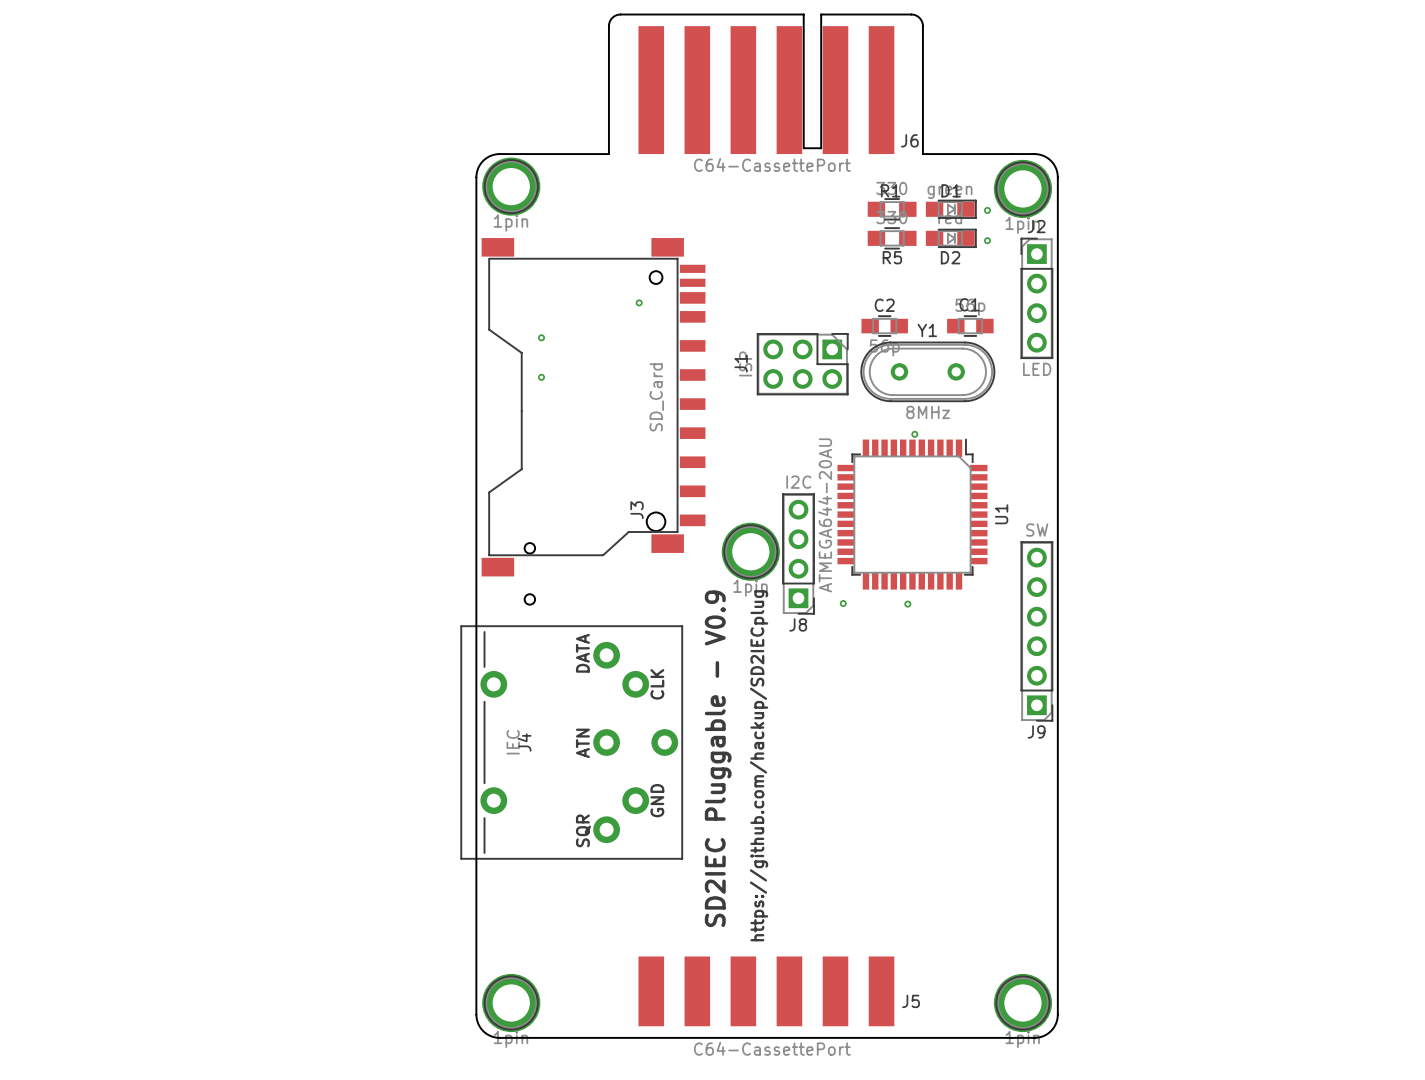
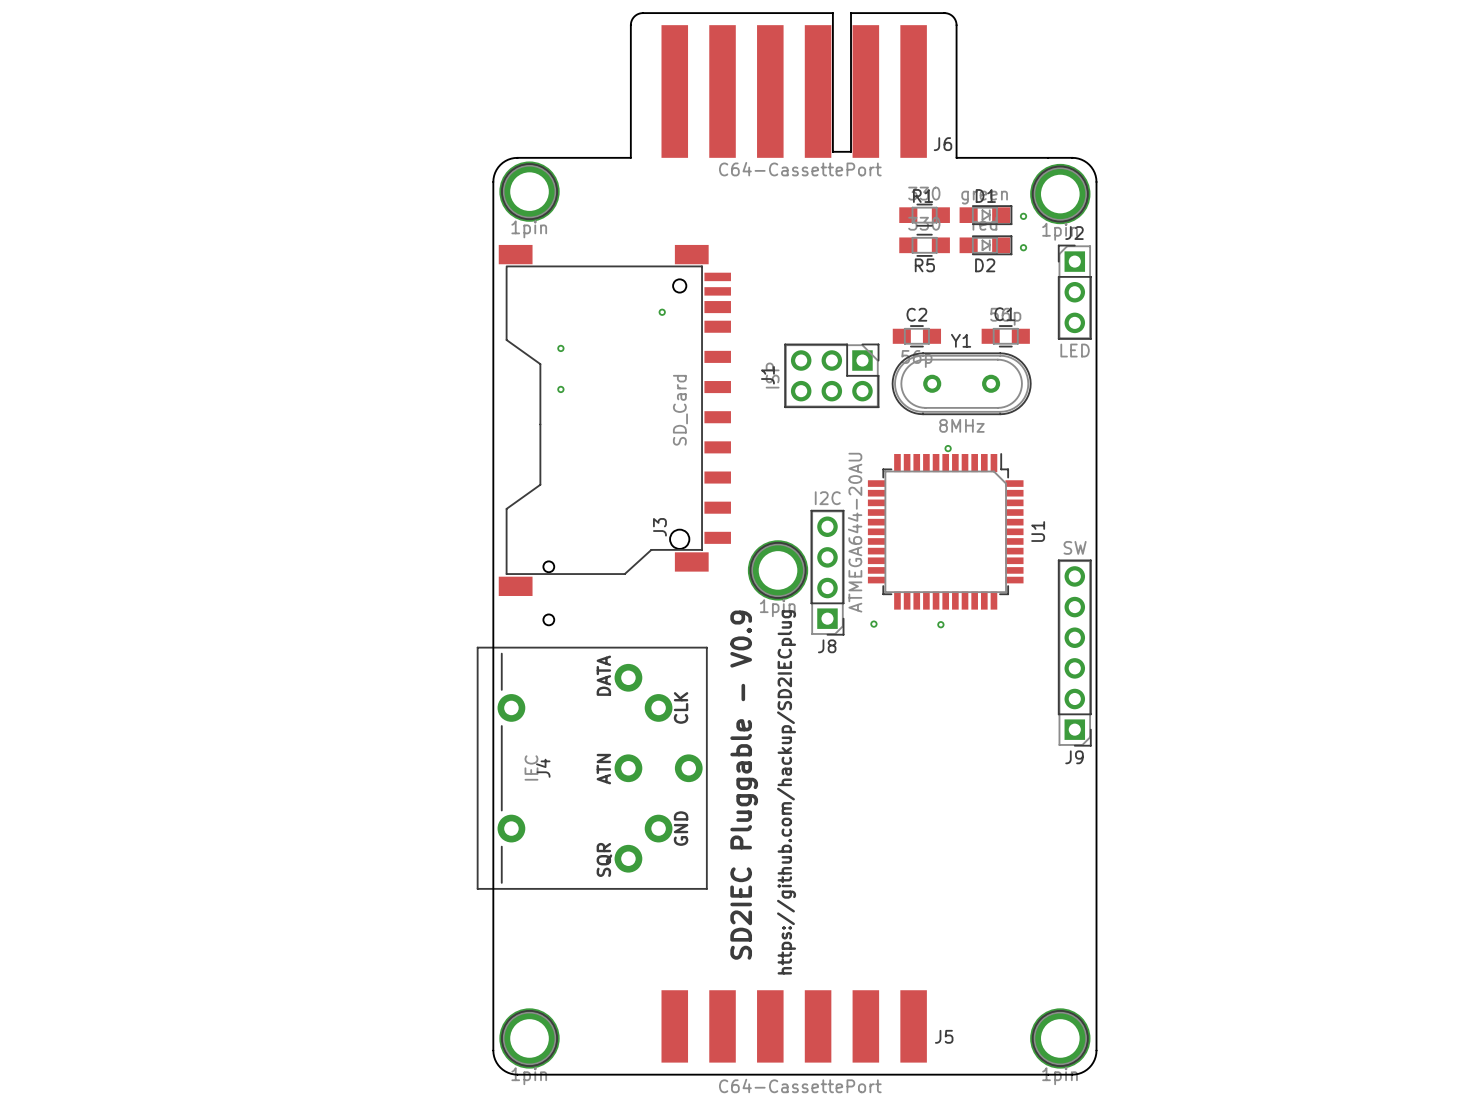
J2 footprint: [1020, 237, 1054, 359] -> [1058, 244, 1092, 340]

